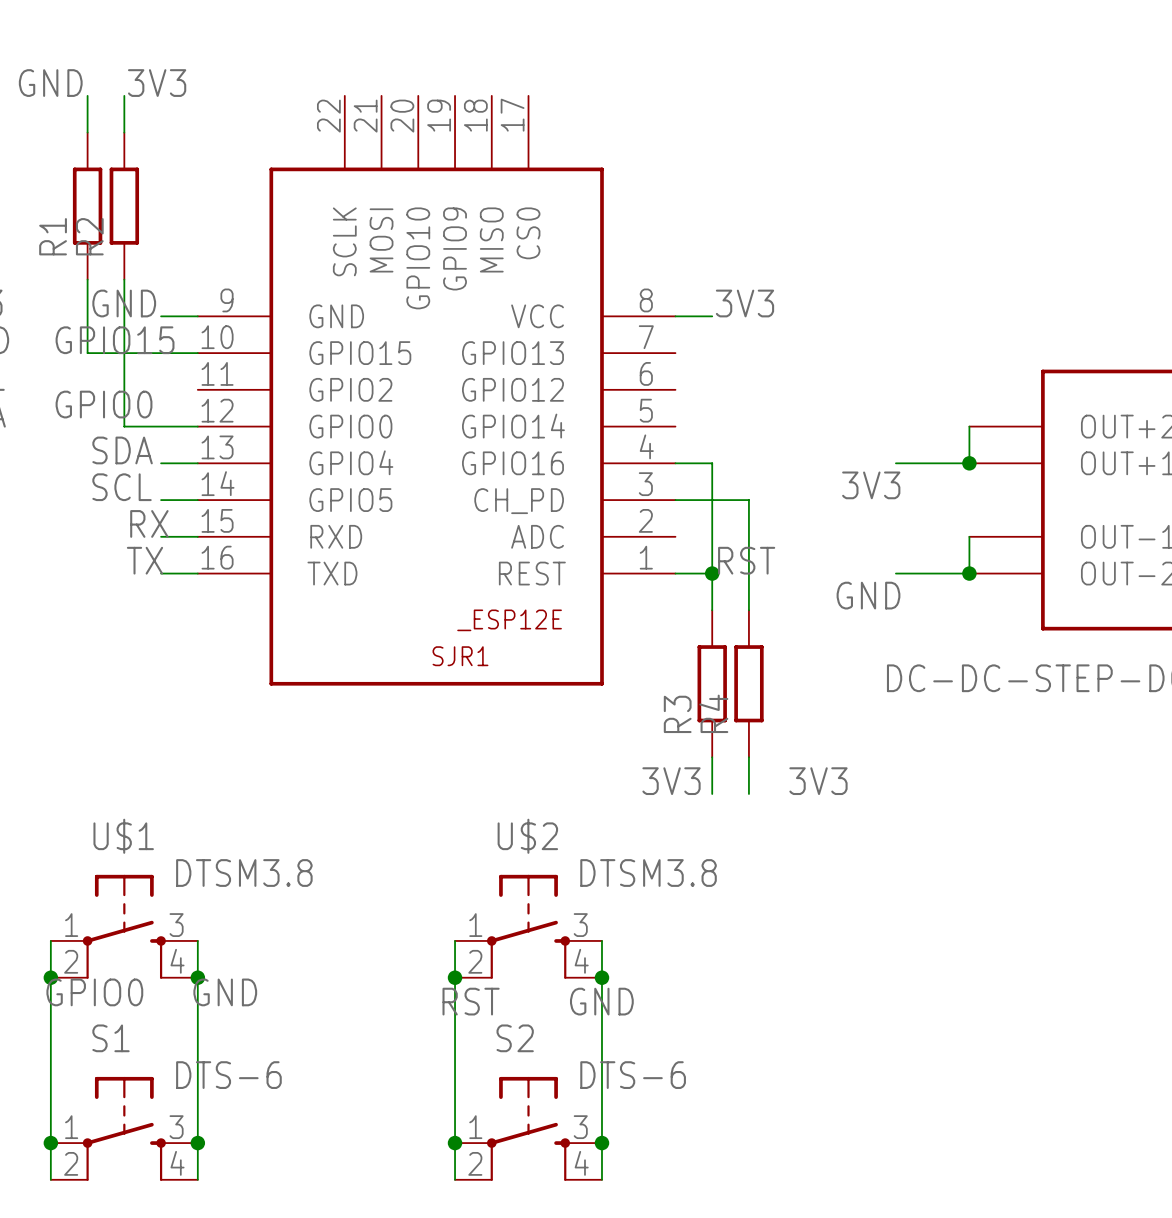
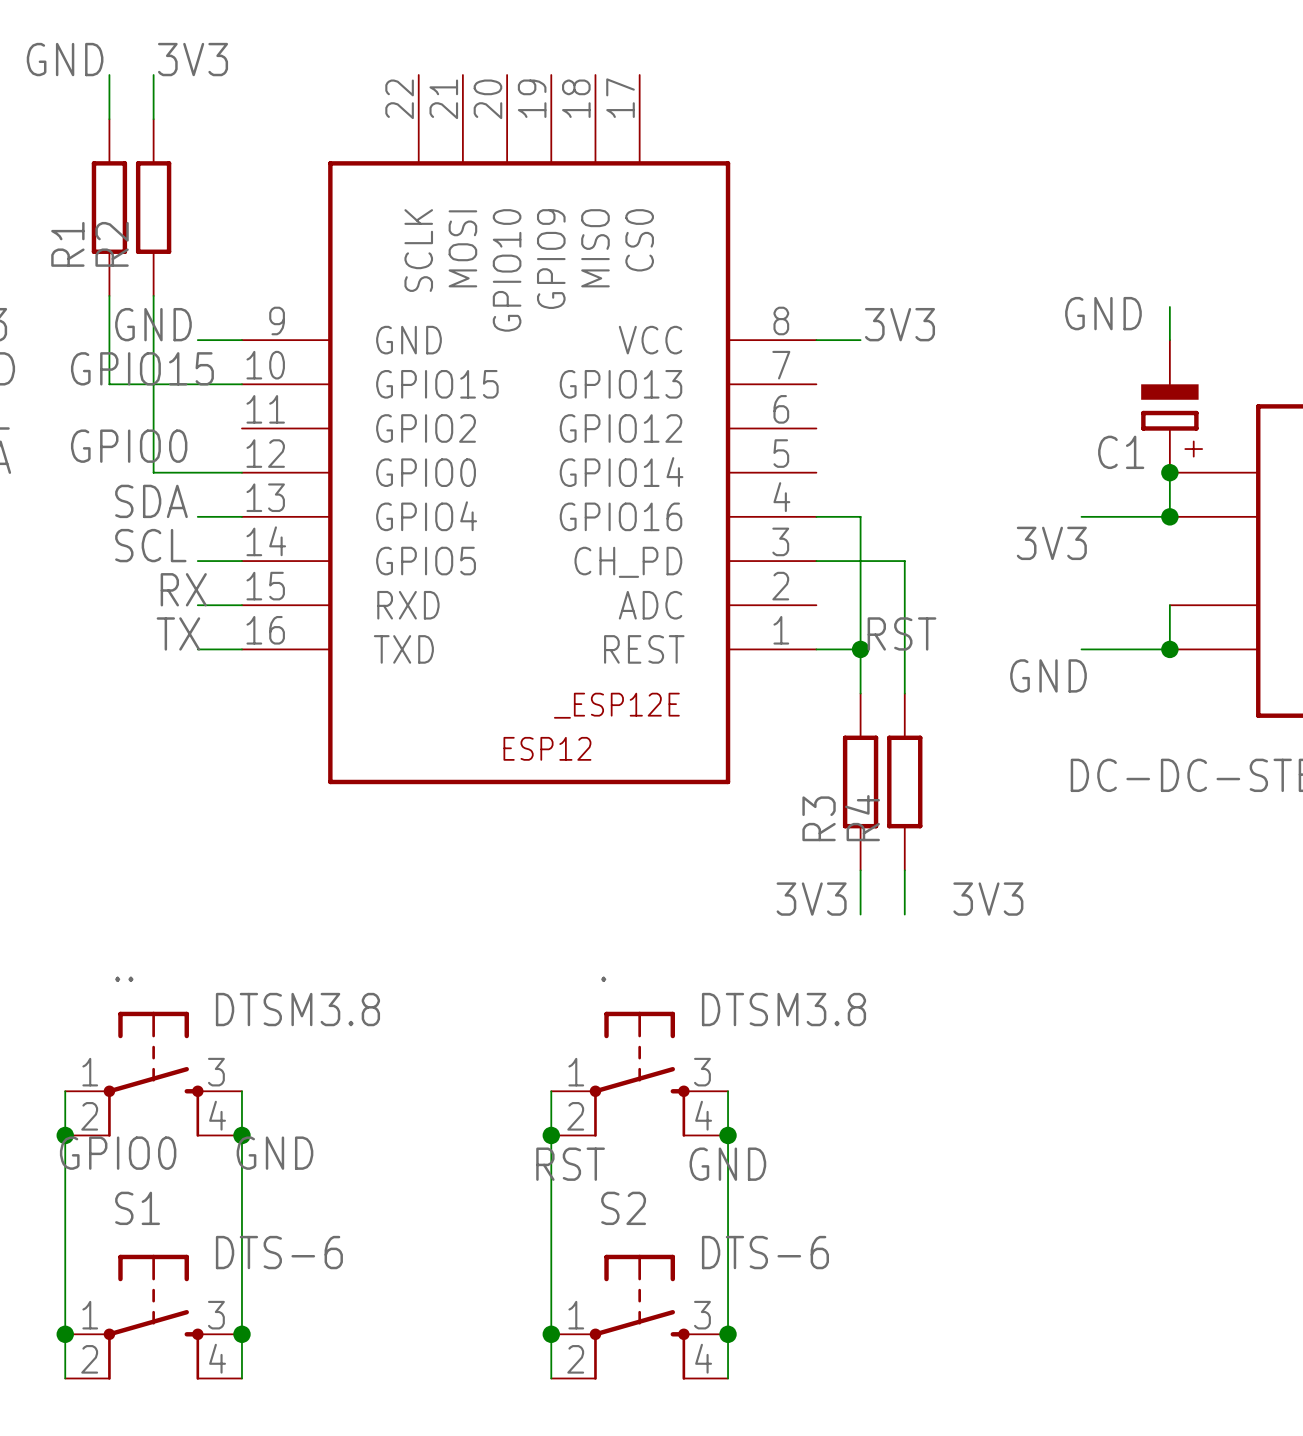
wire: none -> (1169, 306) (1169, 340)
label: none -> GND (1103, 313)
C1: none -> (1169, 406)
junction: none -> (1169, 472)
SJR1 name: SJR1 (460, 656) -> ESP12 (547, 748)
U$1 name: U$1 (123, 836) -> .. (124, 979)
U$2 name: U$2 (527, 836) -> . (603, 979)

